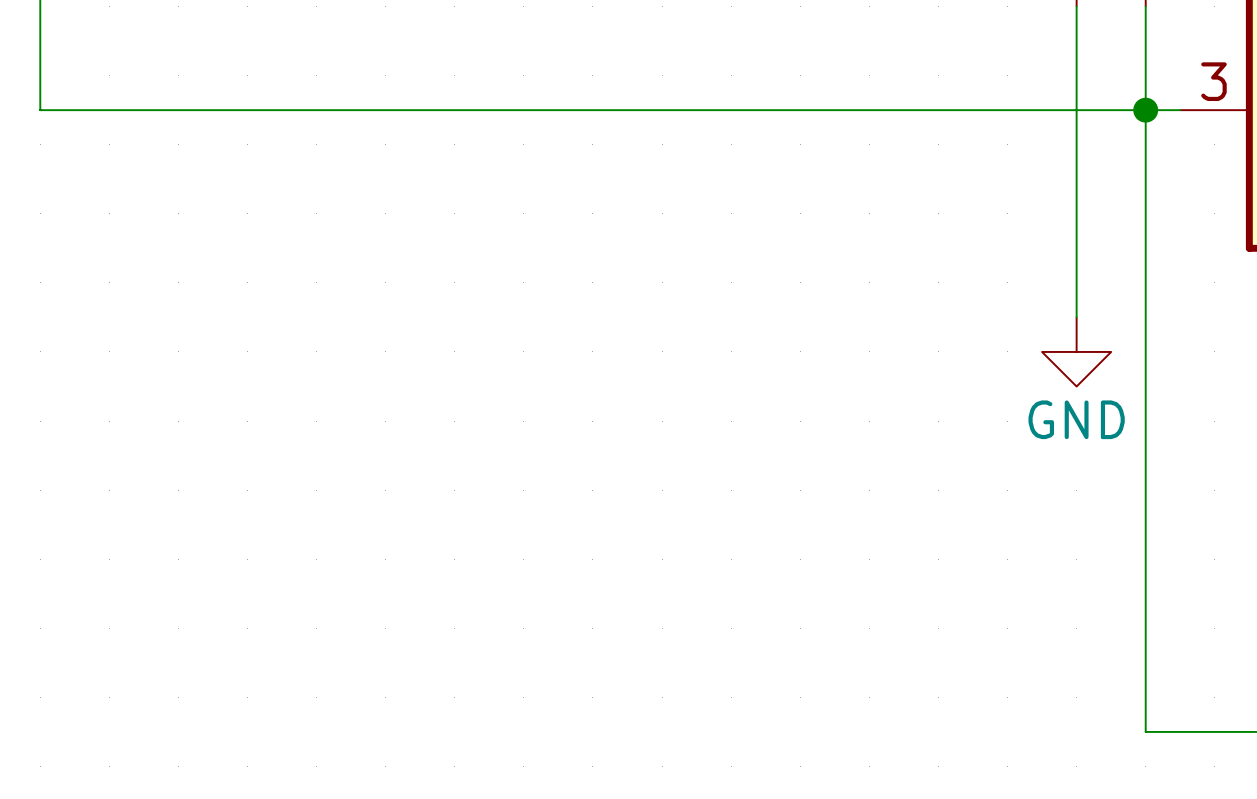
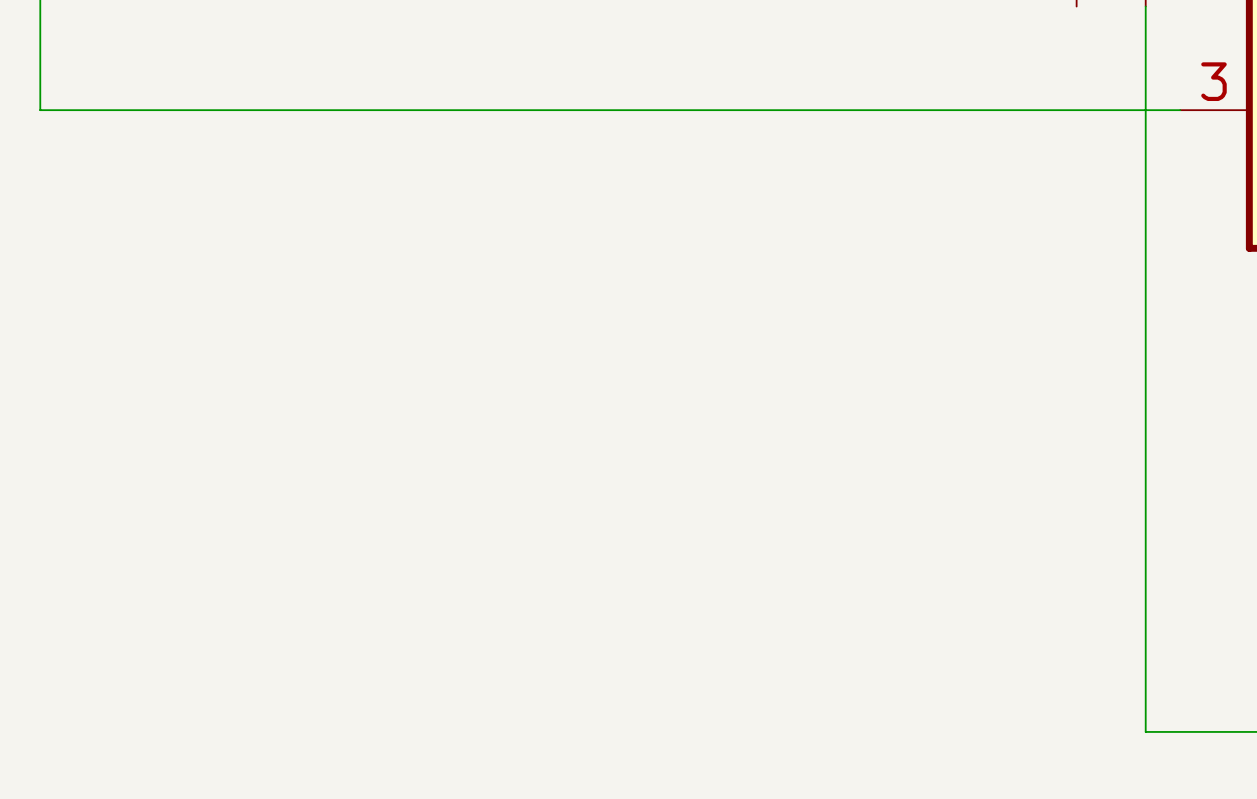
wire: (1076, 6) (1076, 317) -> none
junction: (1145, 110) -> none
power symbol: GND (1076, 351) -> none

